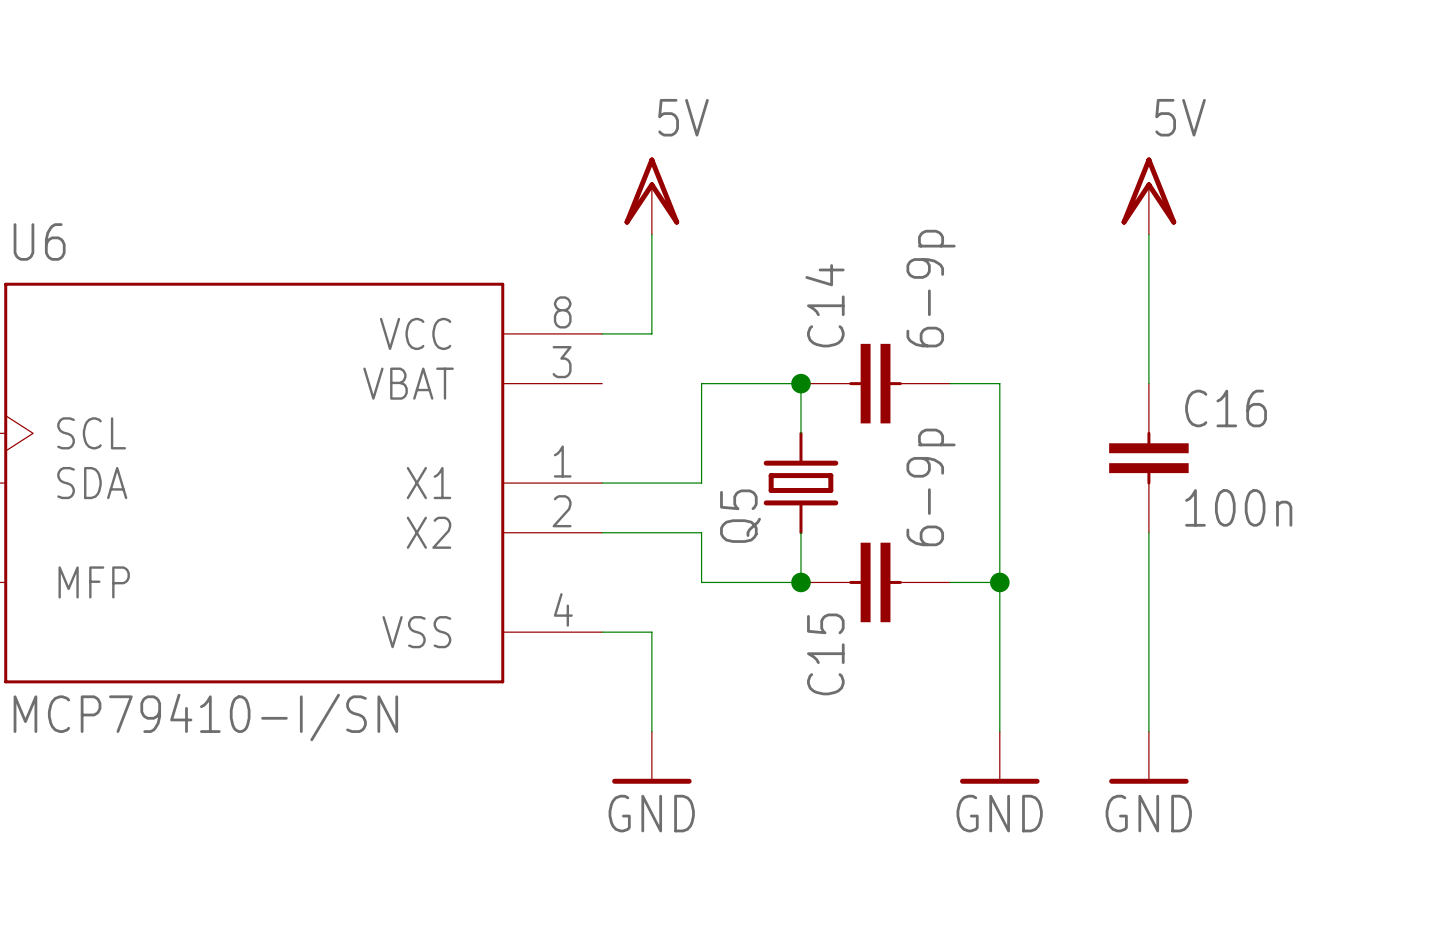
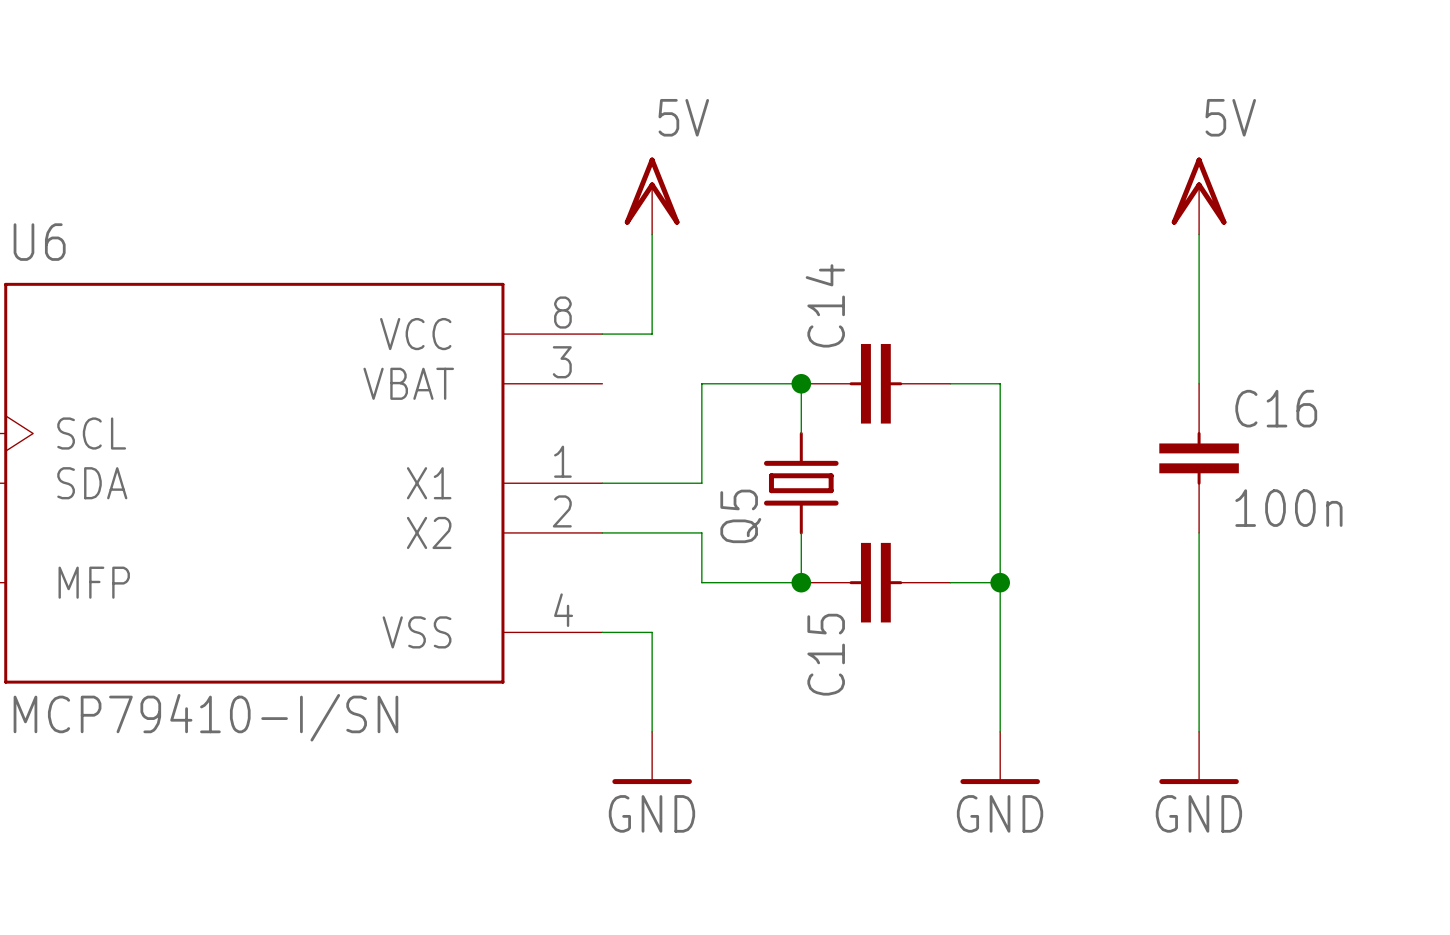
label position: 5V (1180, 117) -> 5V (1230, 117)
power symbol position: (1148, 196) -> (1199, 196)
wire: (1148, 234) (1148, 383) -> (1199, 234) (1199, 383)
C14 value: 6-9p (931, 288) -> none
C16 position: (1148, 458) -> (1199, 458)
C15 value: 6-9p (931, 487) -> none
wire: (1148, 532) (1148, 731) -> (1199, 532) (1199, 731)
power symbol position: GND (1148, 757) -> GND (1199, 757)

